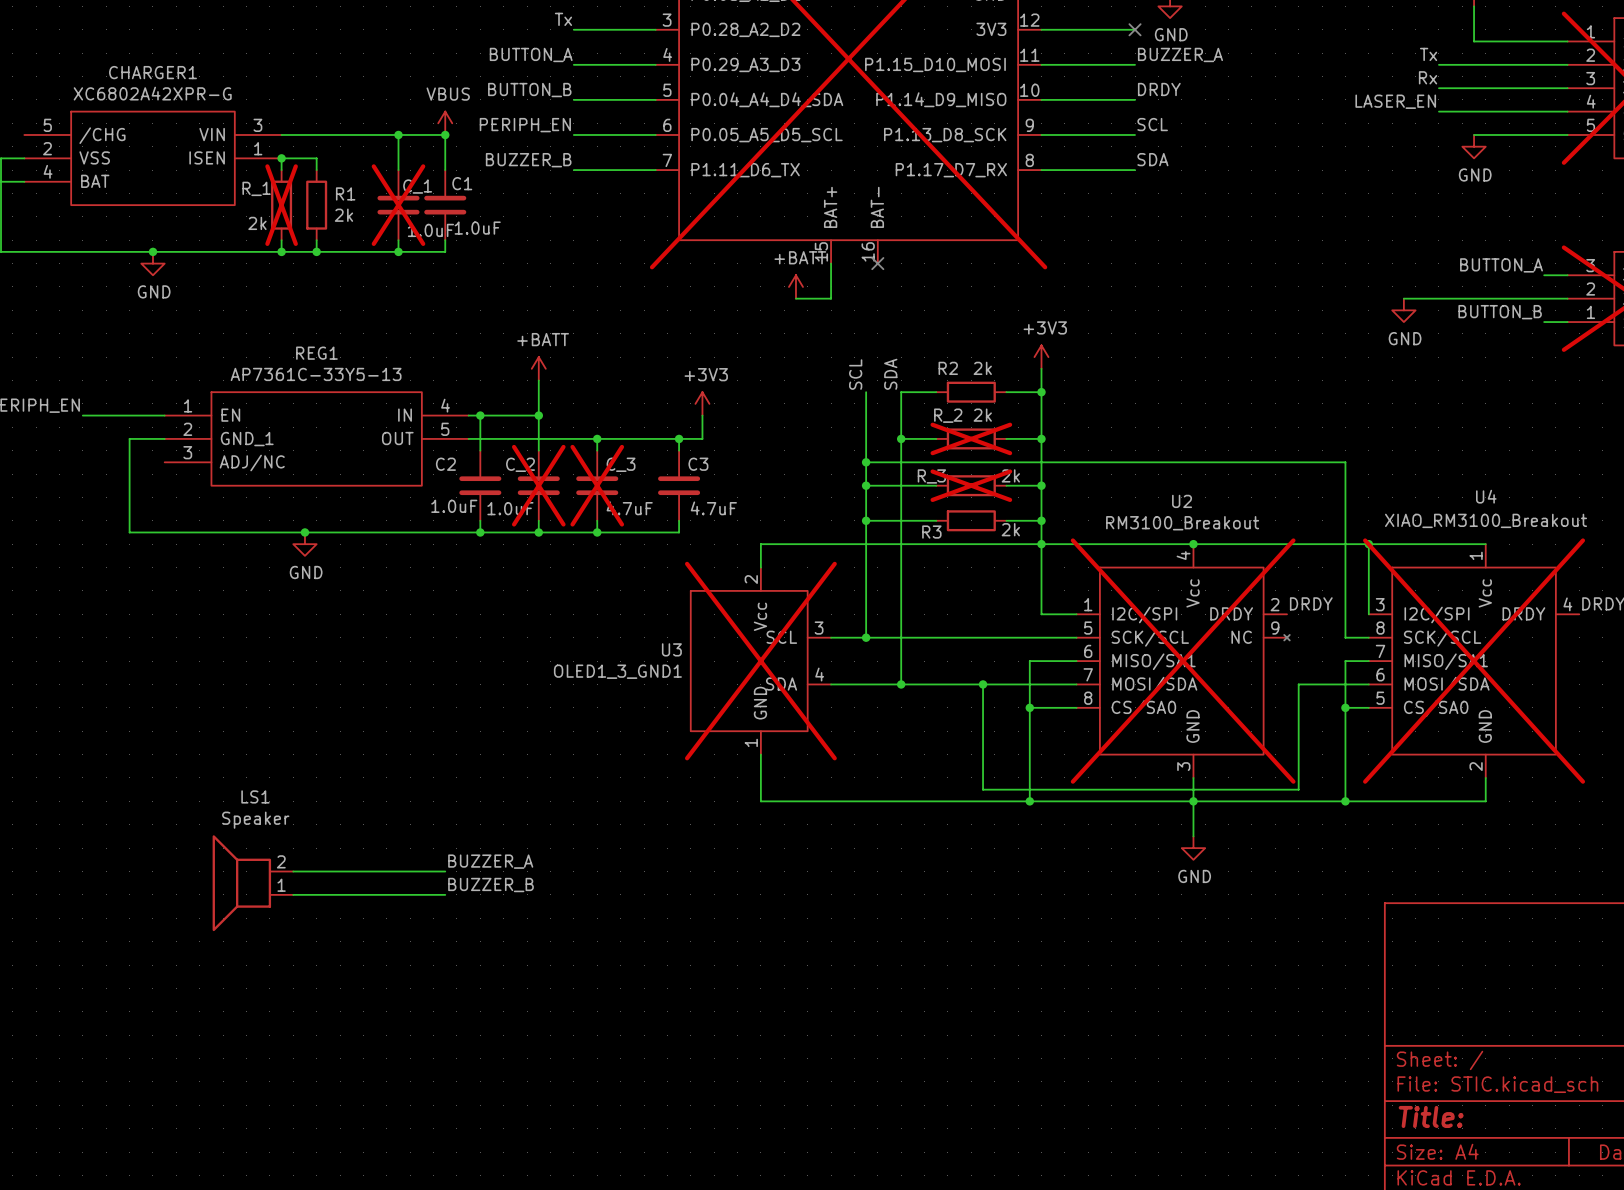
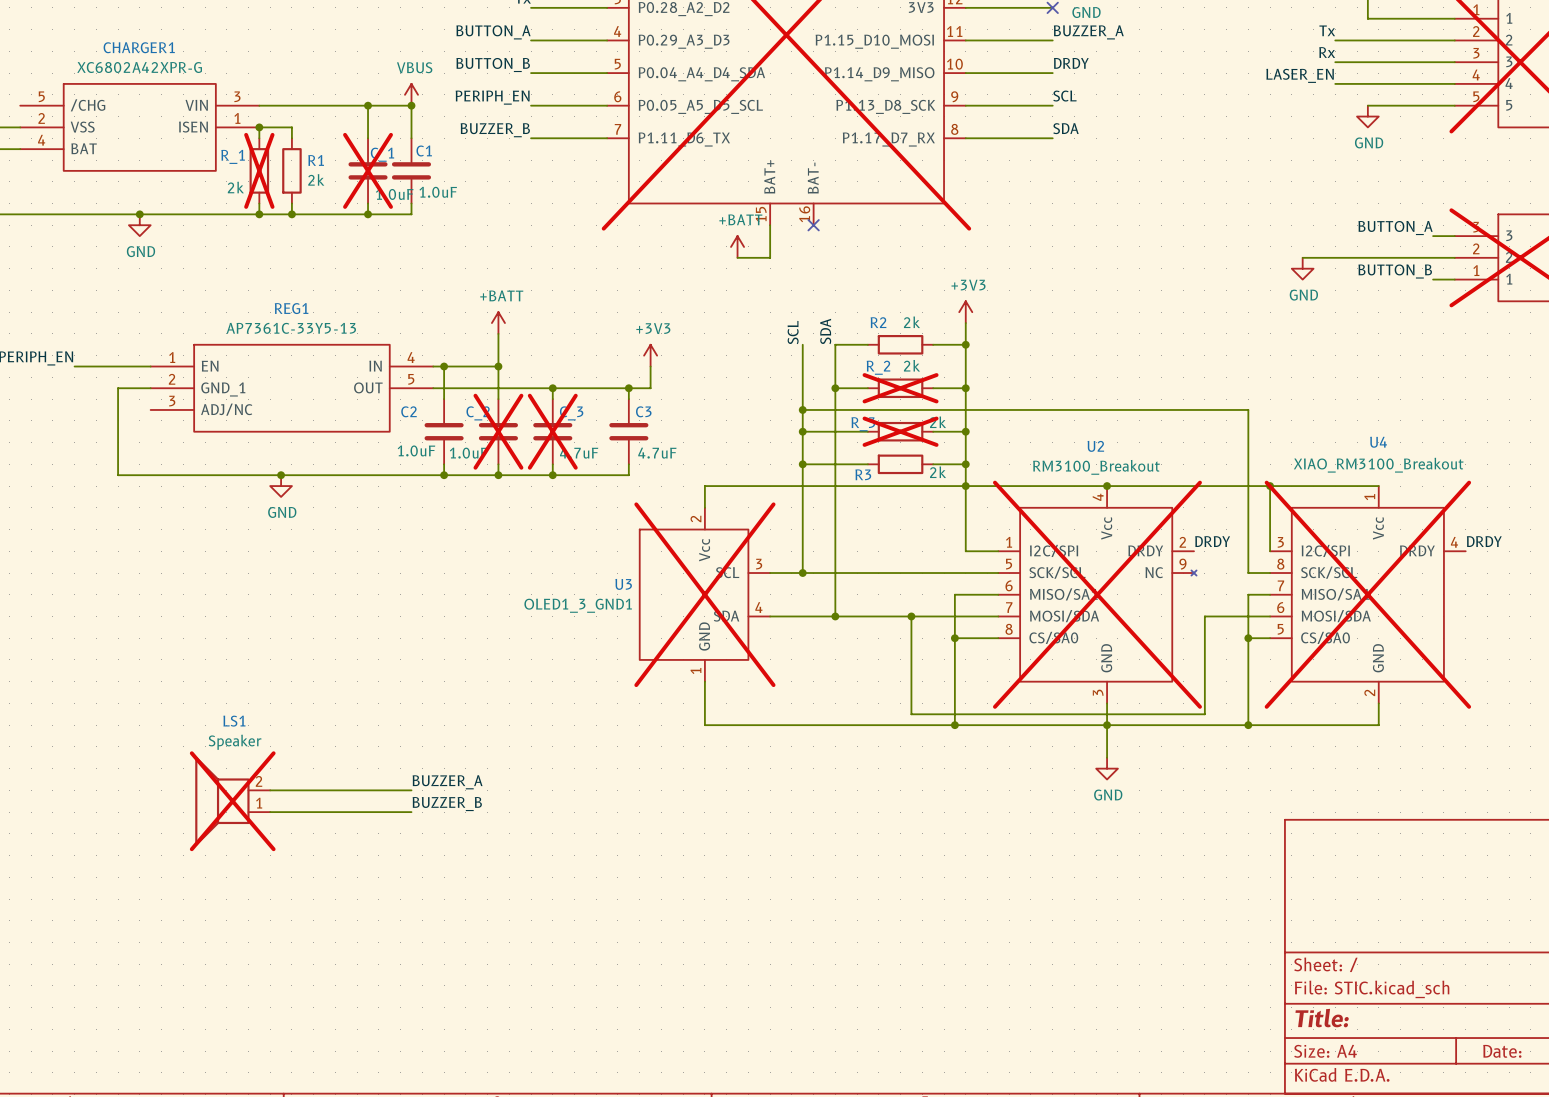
LS1 do-not-place cross: none -> (232, 801)

